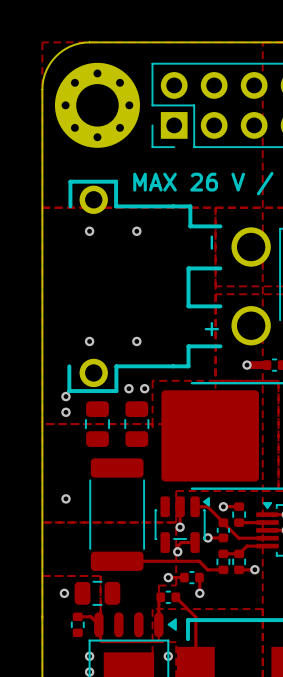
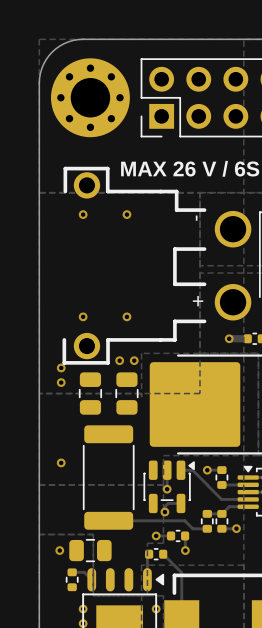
part: (223, 530) -> none
track: (207, 537) (223, 537) -> none
via: (207, 537) -> none

